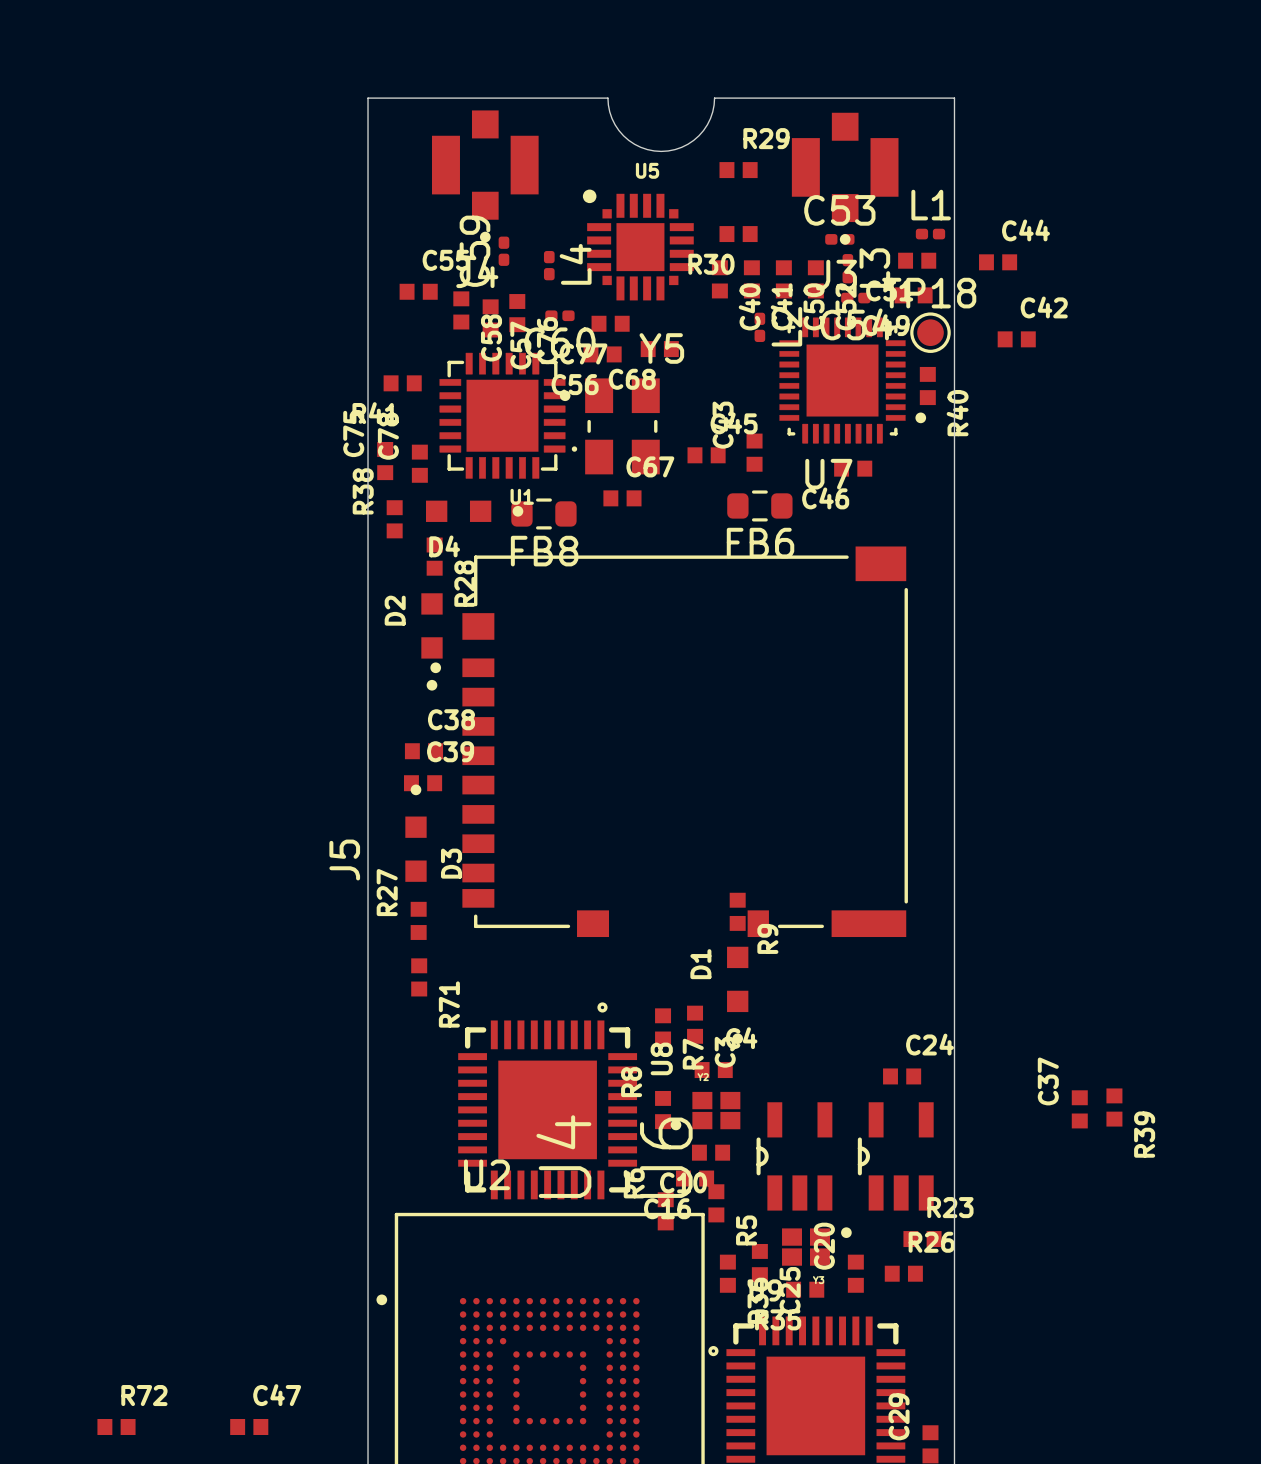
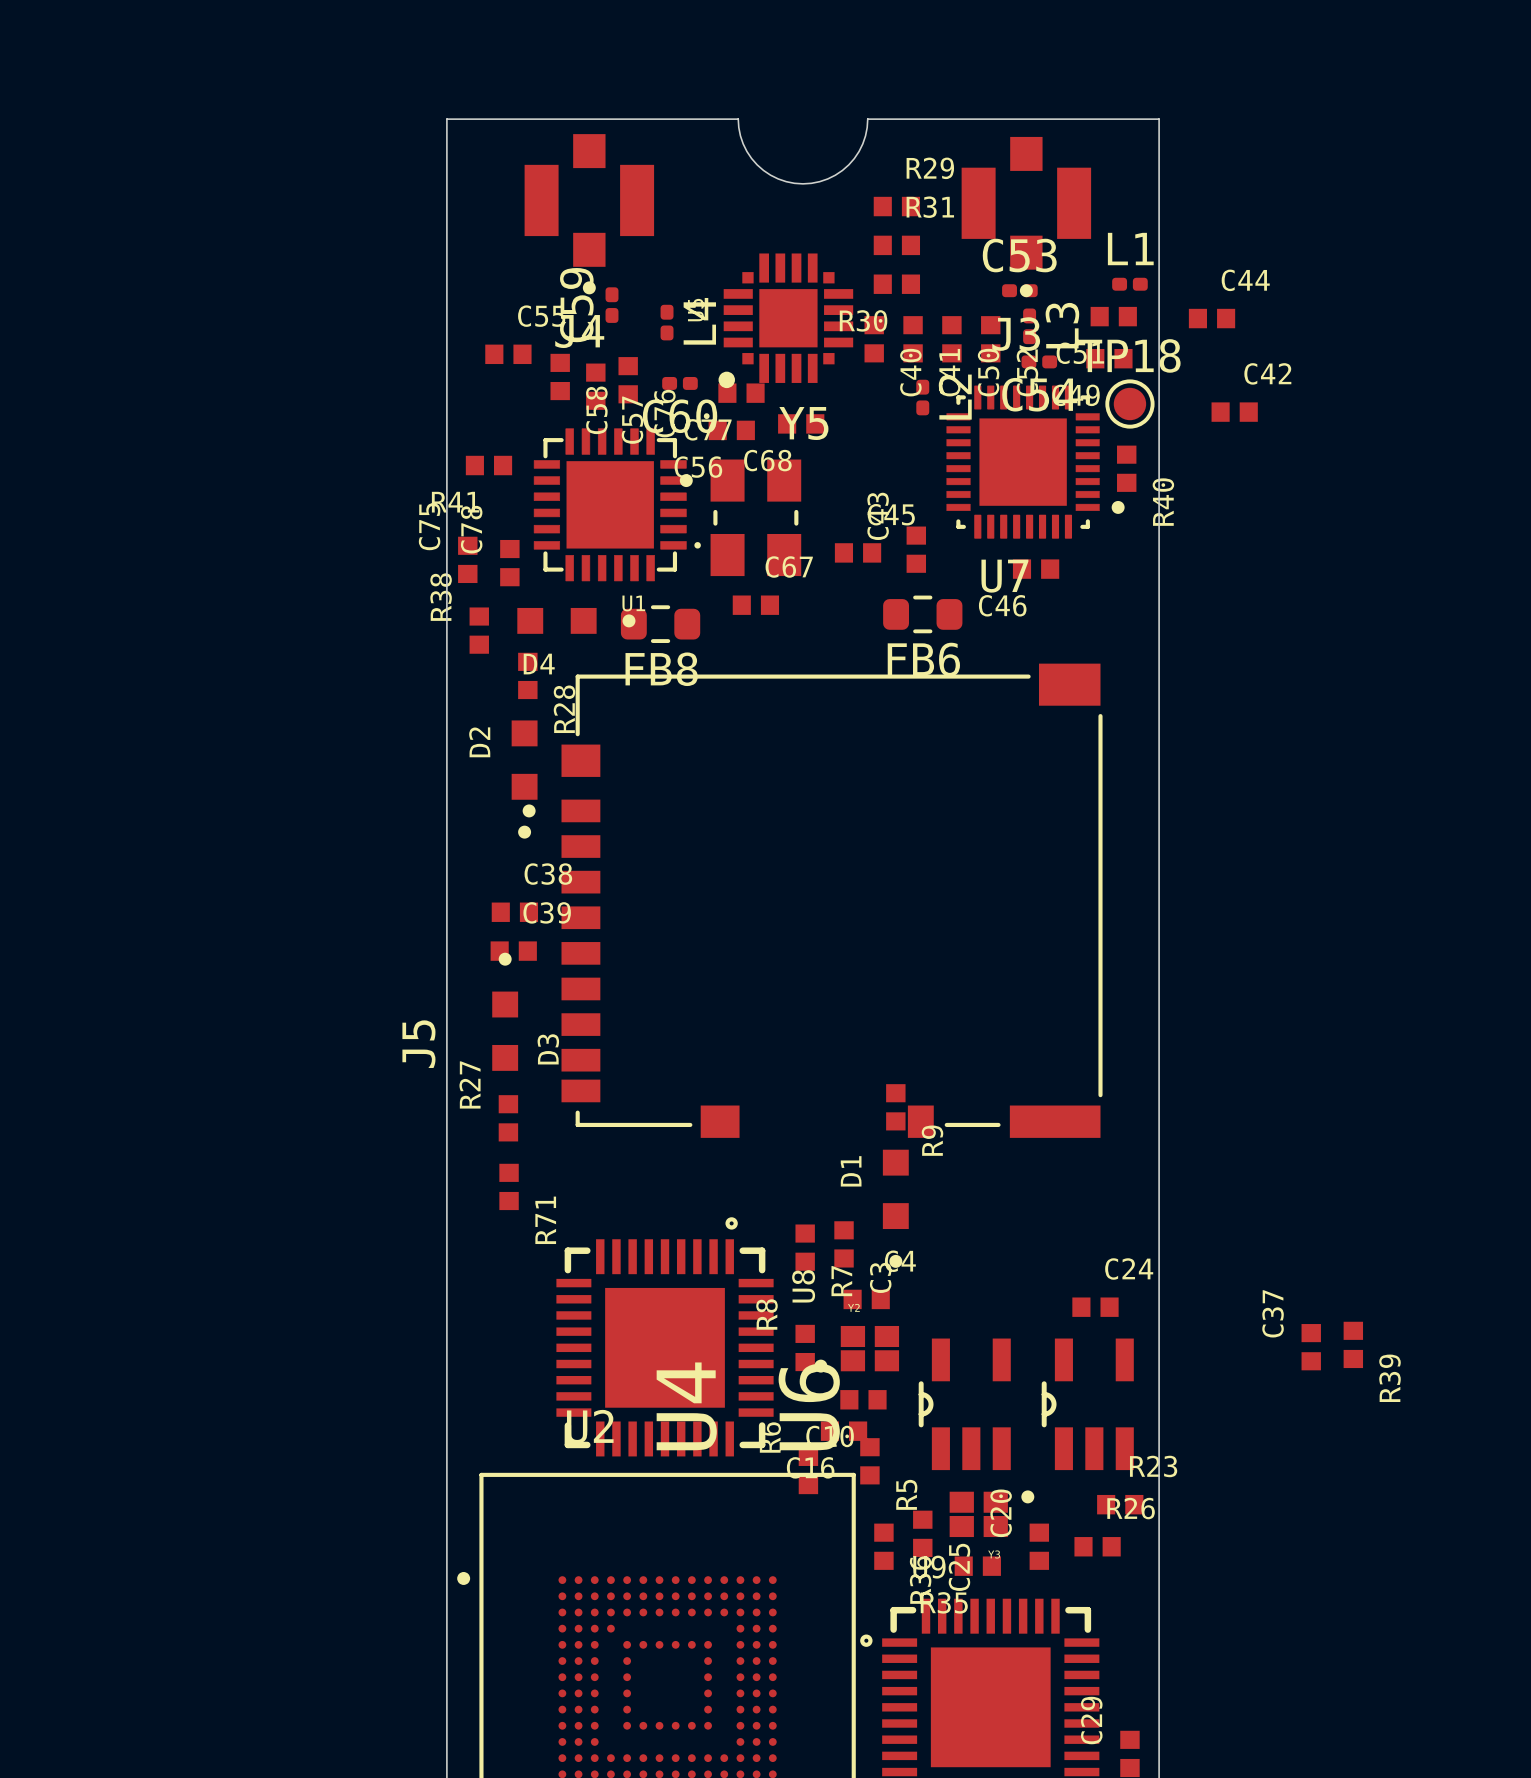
R31: none -> (896, 245)
U5 rotation: 0° (638, 245) -> 90° counterclockwise (785, 320)
R72: (116, 1426) -> none
C47: (249, 1426) -> none

